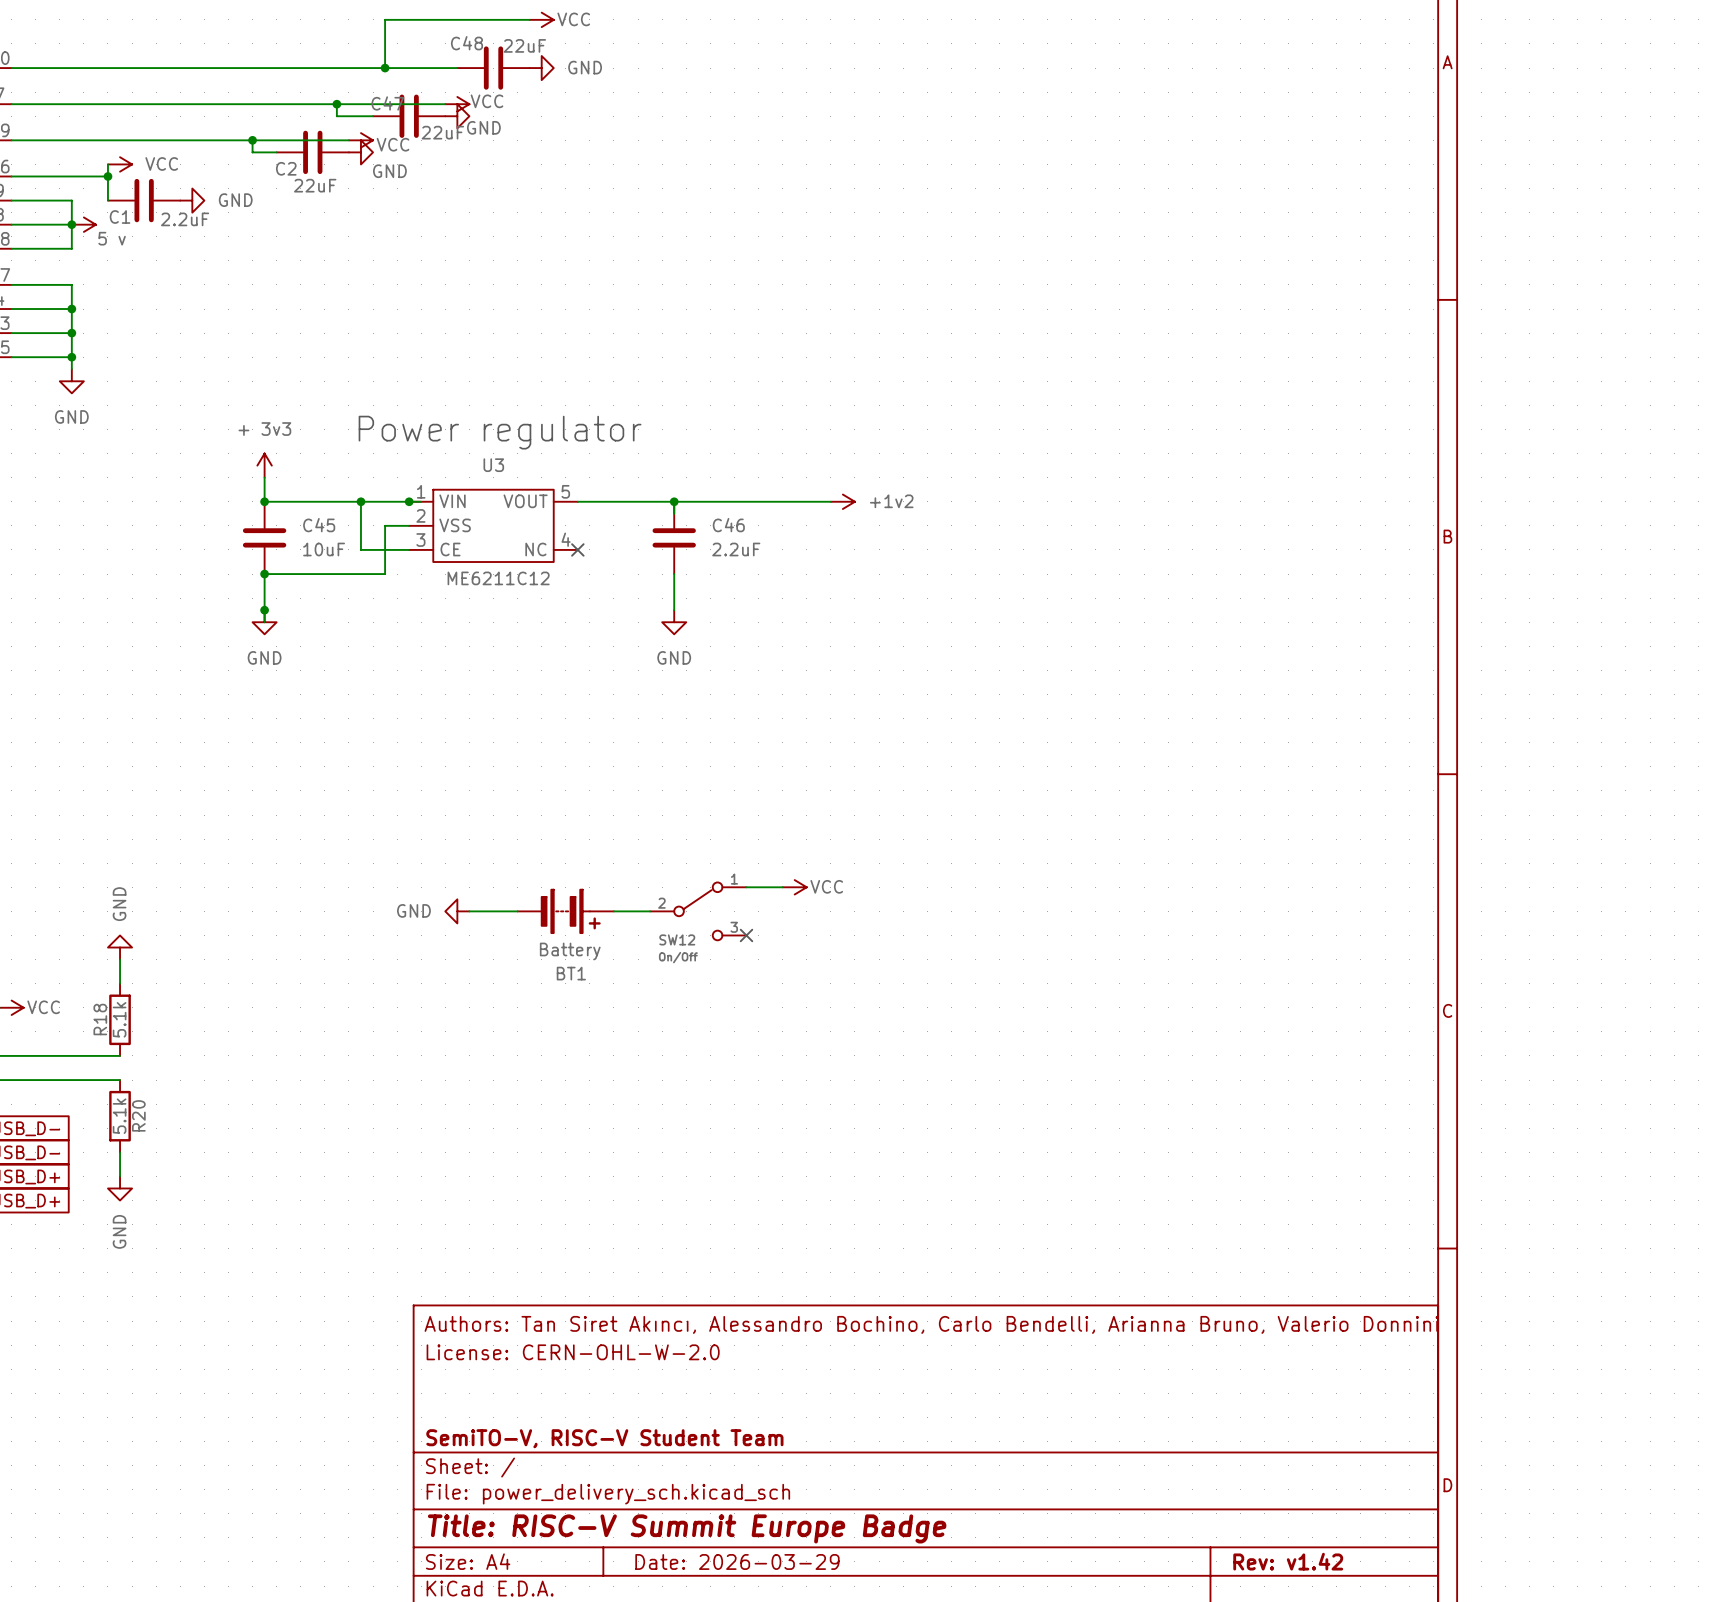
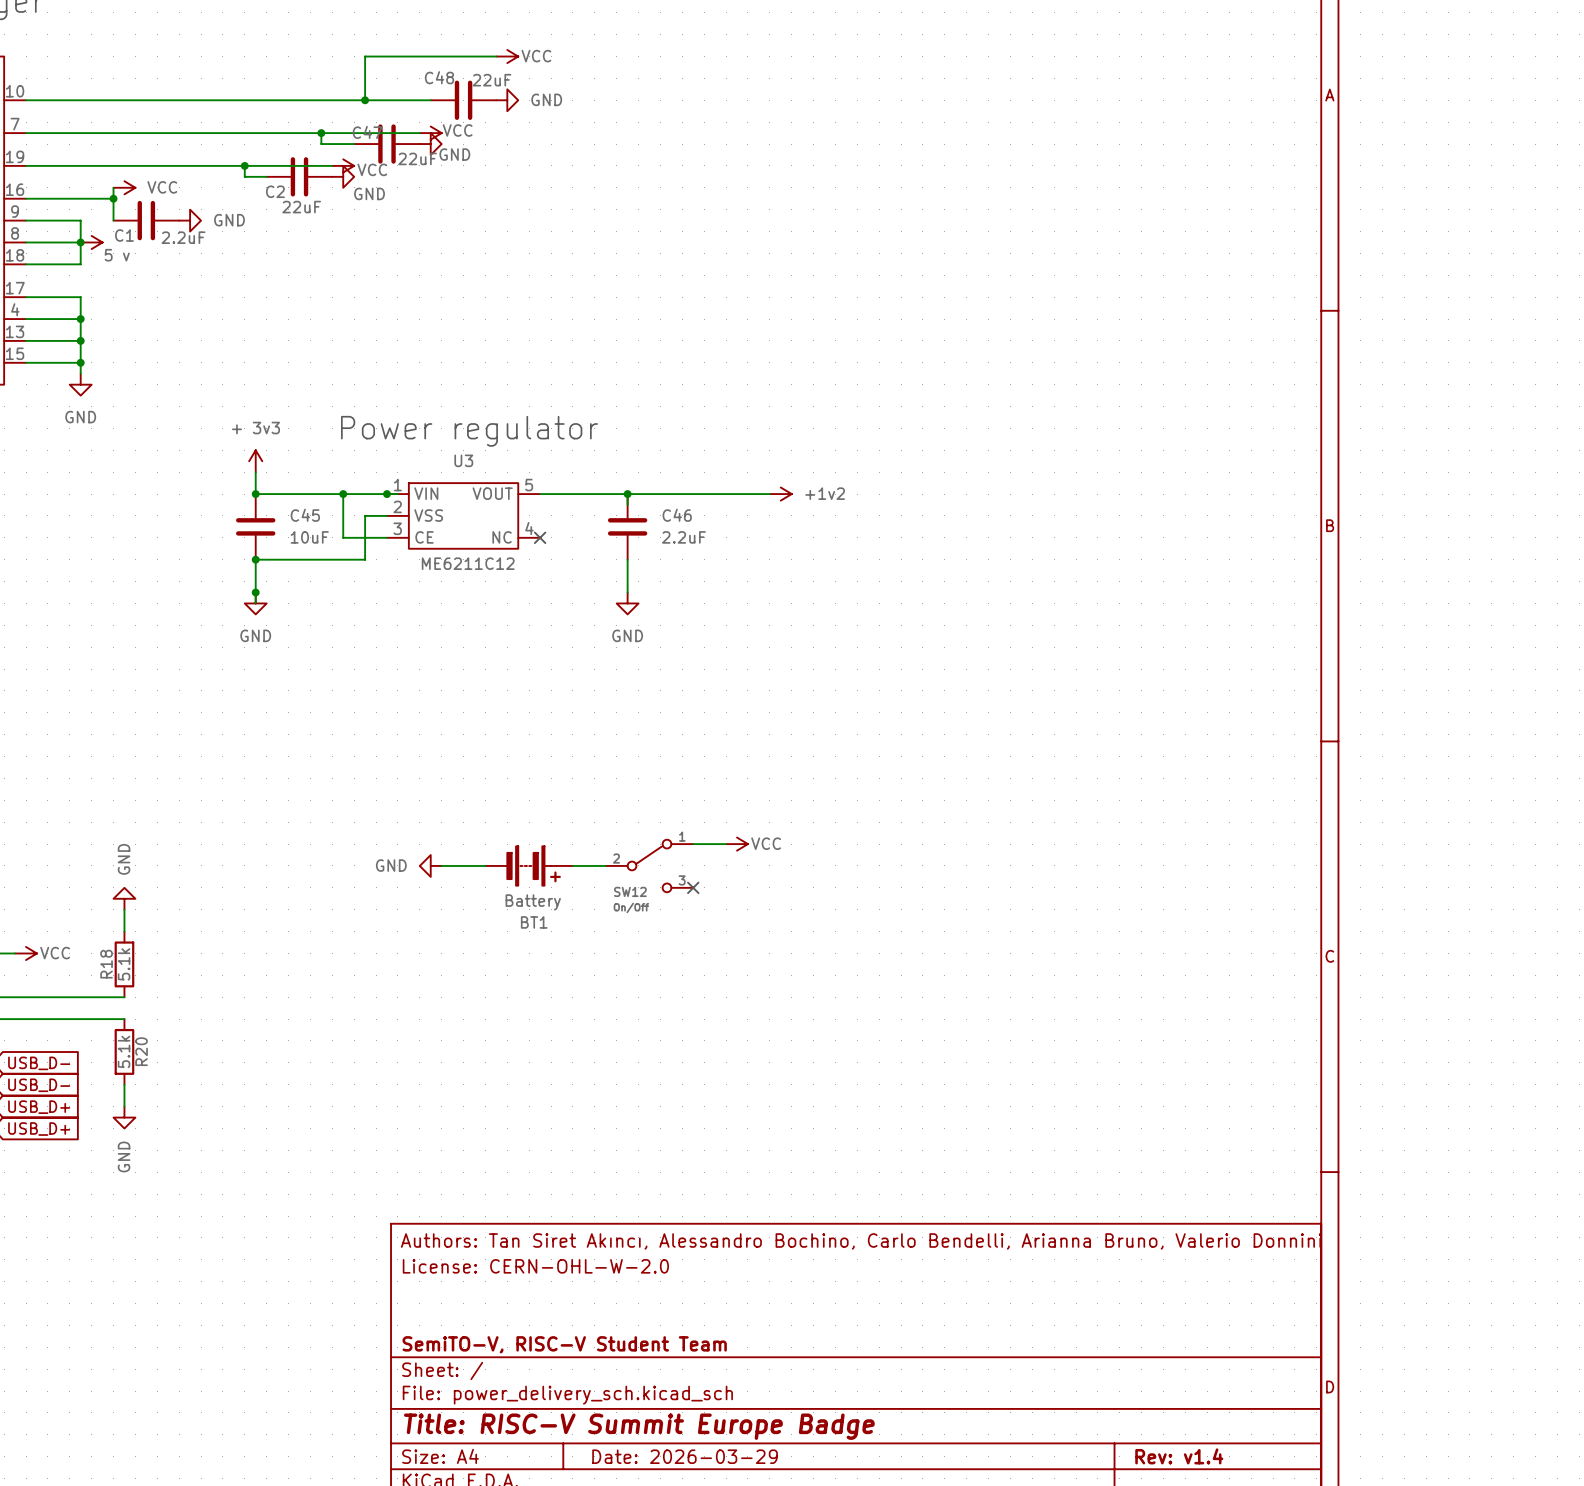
title block: Rev: v1.42 (1288, 1561) -> Rev: v1.4 (1179, 1456)

